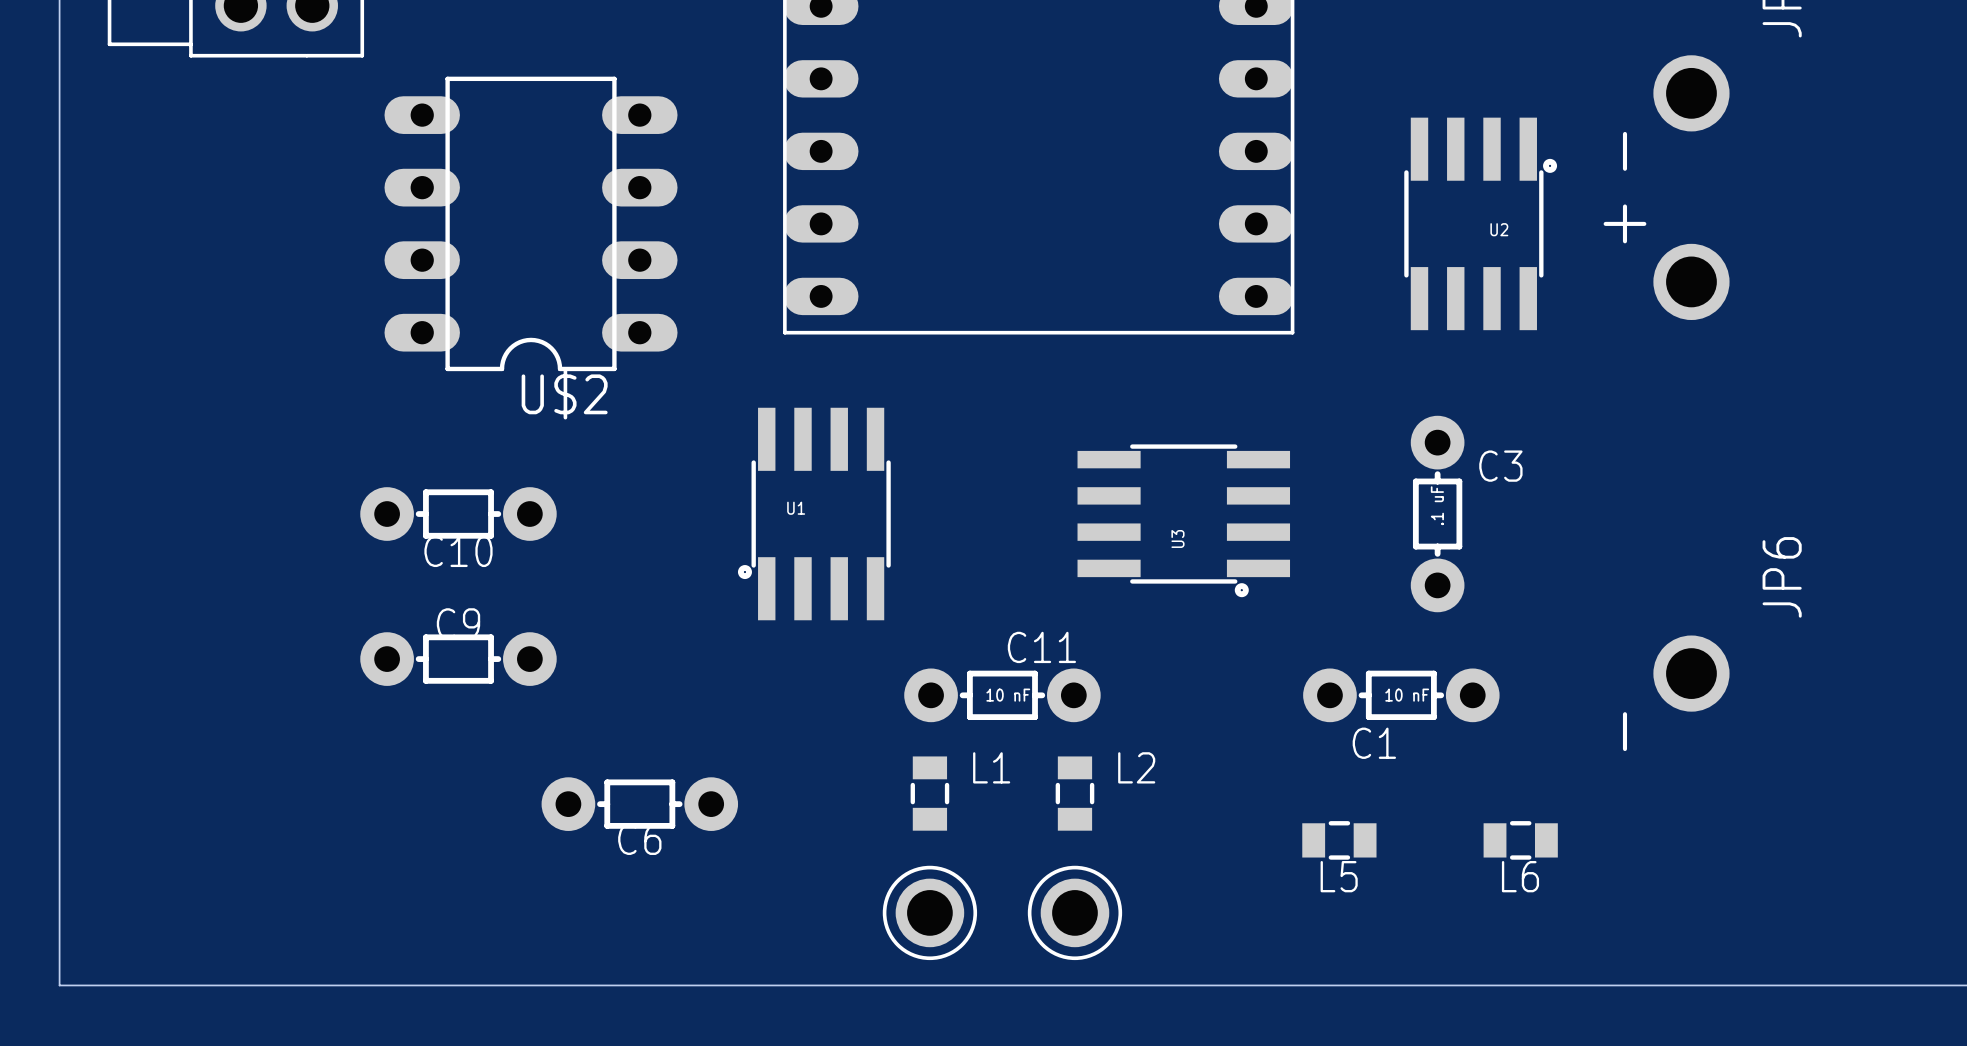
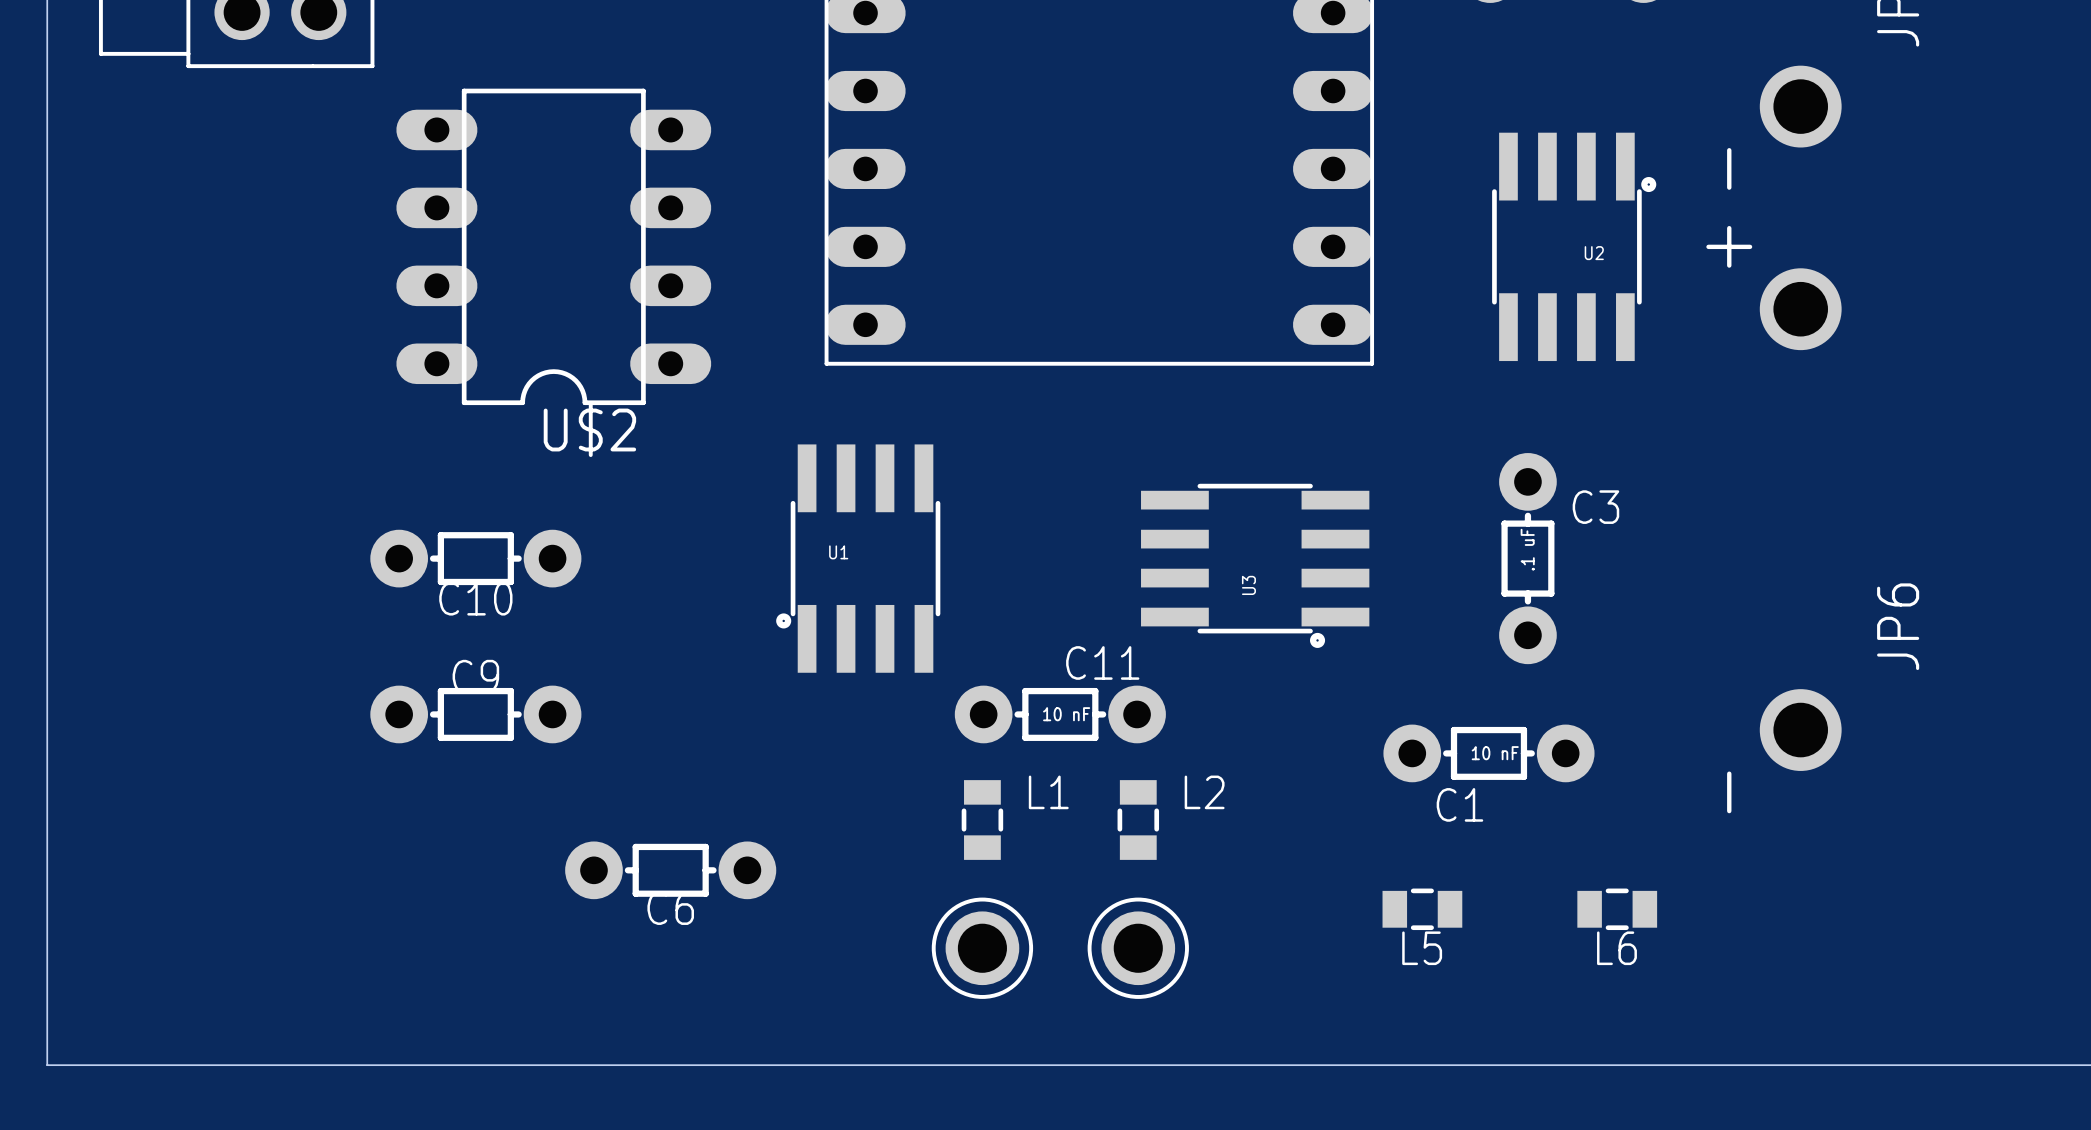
C11 position: (1002, 695) -> (1060, 714)
L1 position: (929, 793) -> (982, 820)
L2 position: (1074, 793) -> (1138, 820)
part position: (929, 912) -> (982, 948)
part position: (1074, 912) -> (1138, 948)

